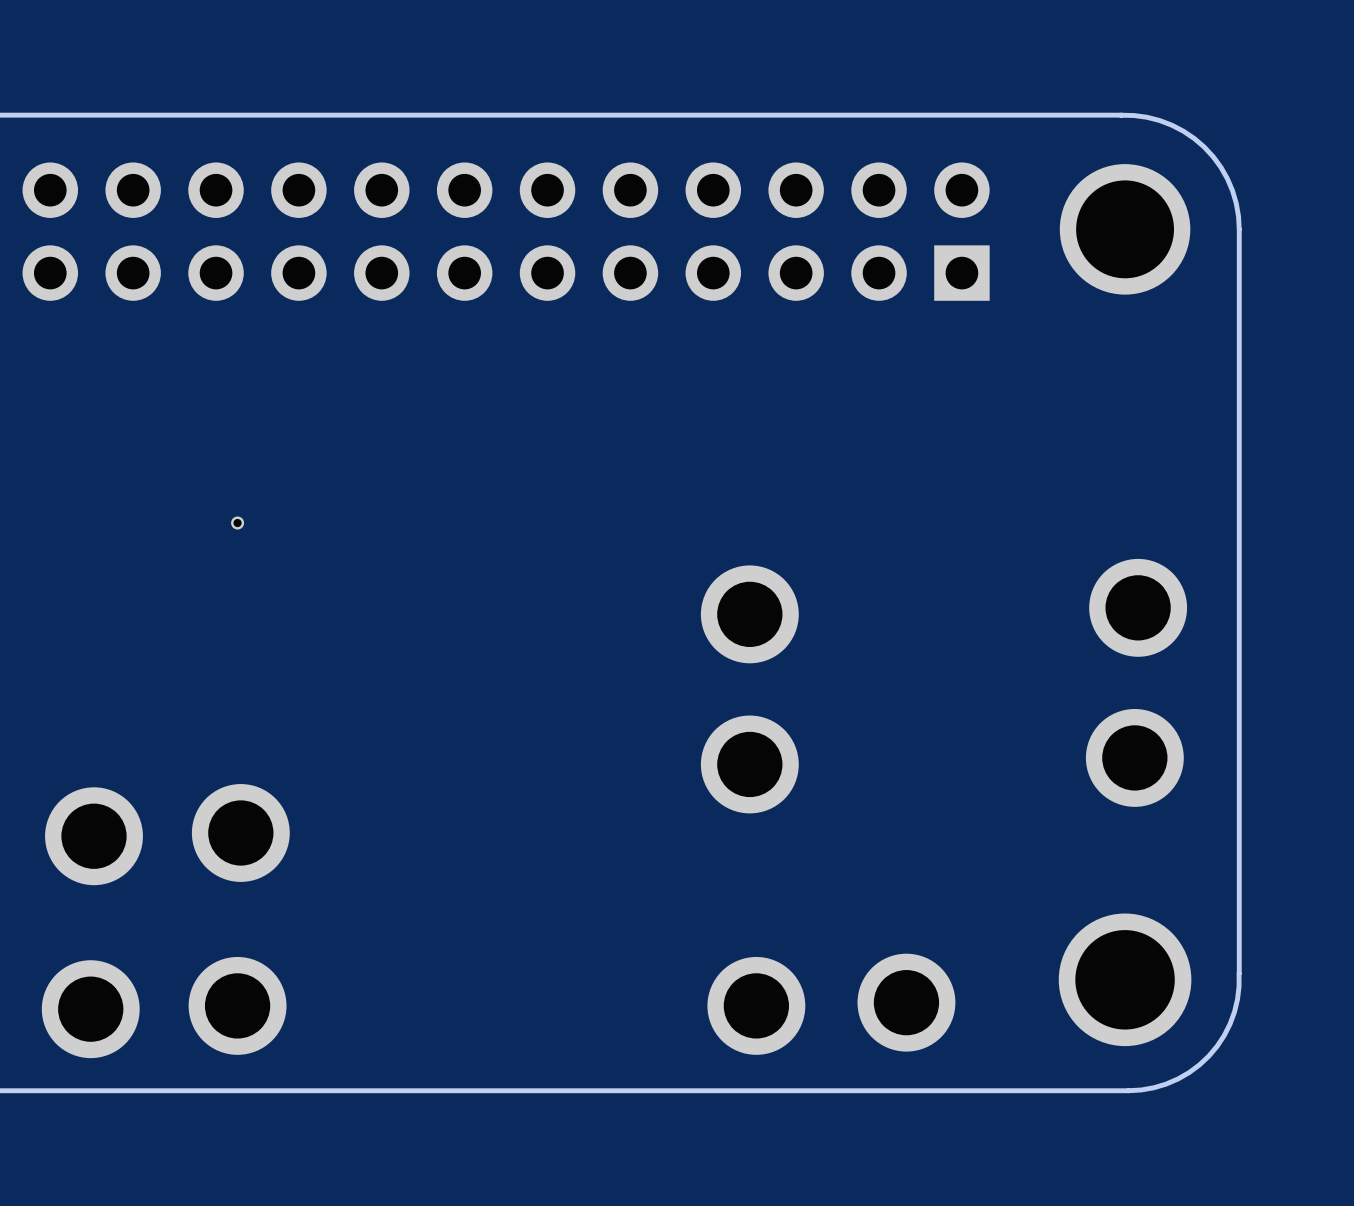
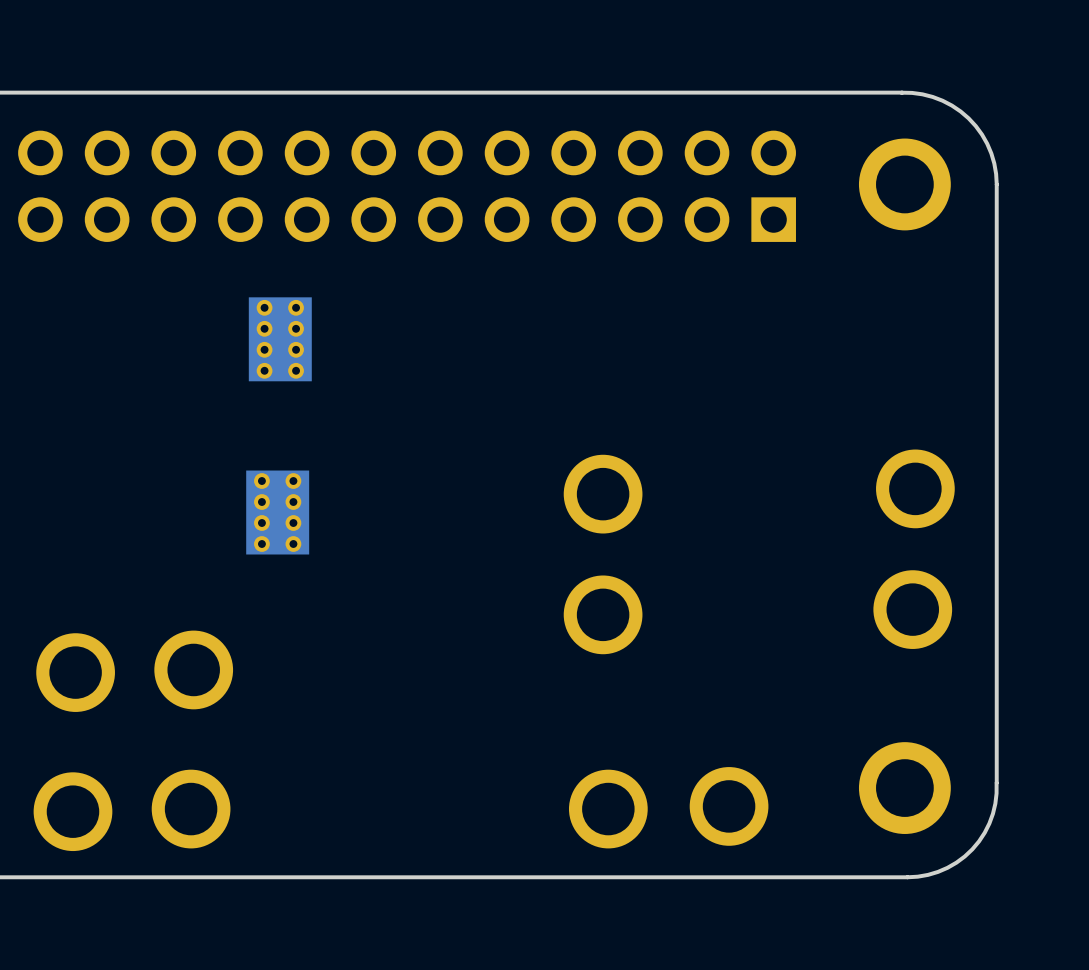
part footprint: [1059, 164, 1191, 295] -> [858, 138, 951, 231]
part: none -> (280, 339)
part: (237, 523) -> none
part: none -> (277, 512)
part footprint: [1058, 913, 1192, 1047] -> [858, 742, 951, 834]

